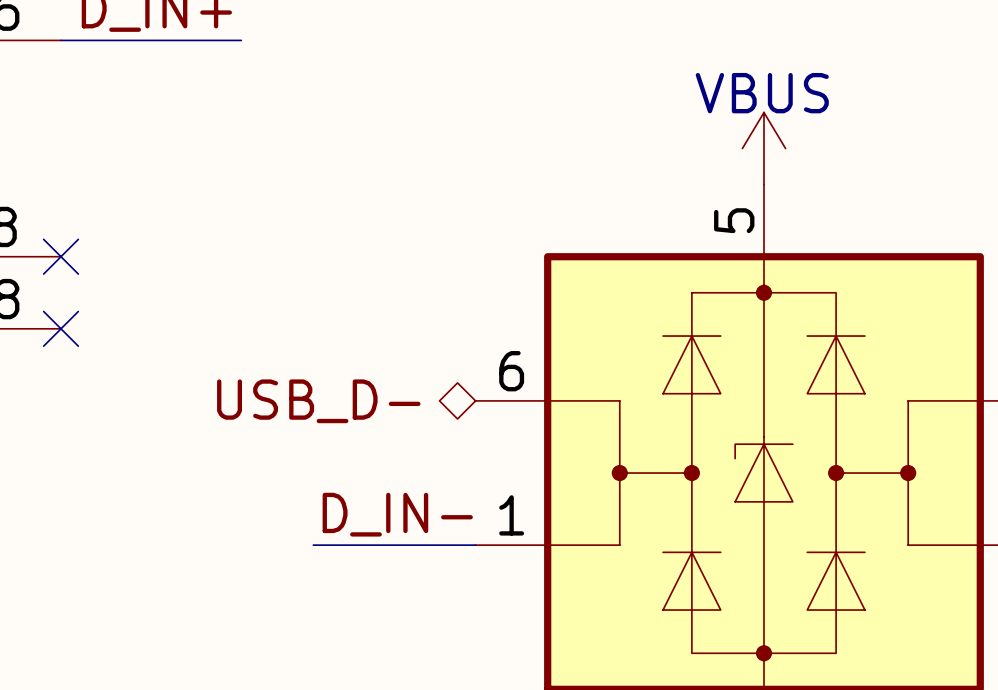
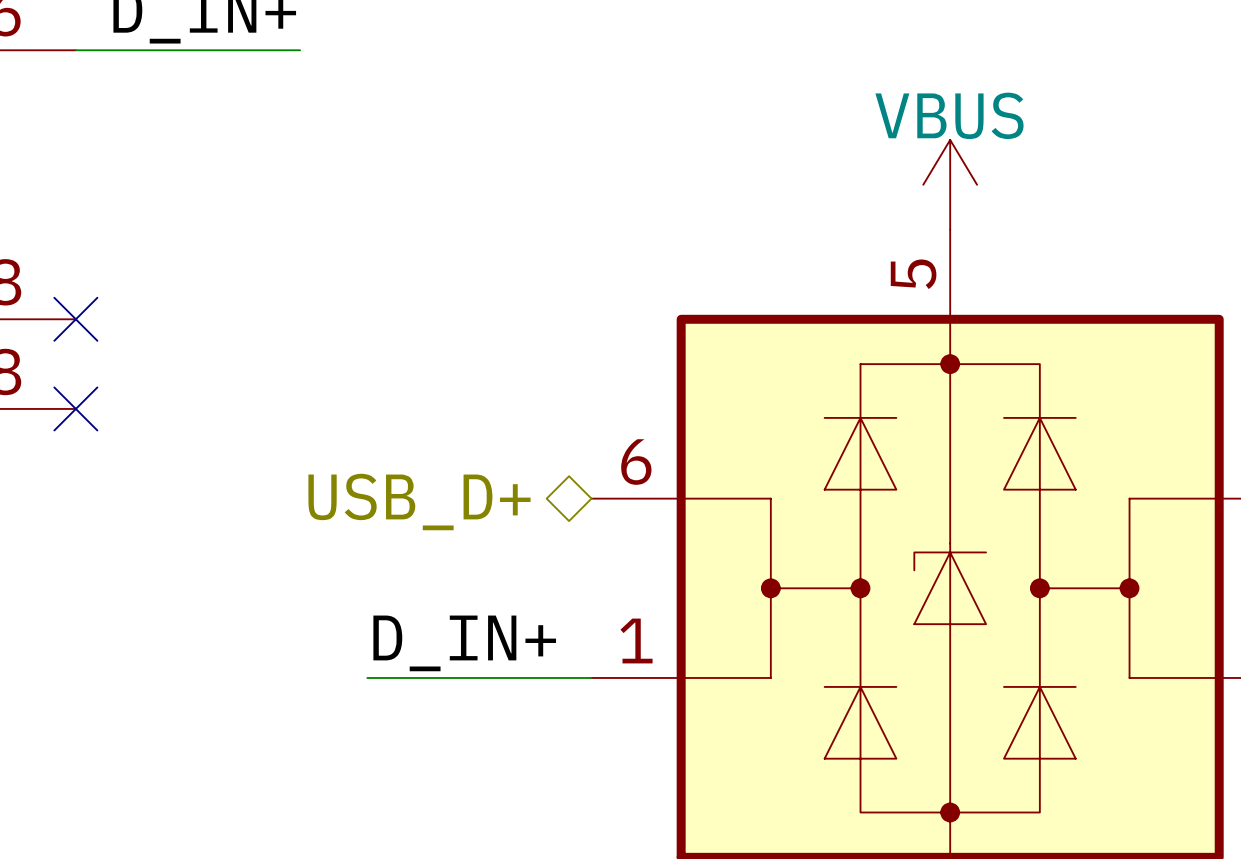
hierarchical label: USB_D- (318, 401) -> USB_D+ (419, 502)
label: D_IN- (397, 514) -> D_IN+ (464, 643)
wire: none -> (367, 677) (389, 677)

